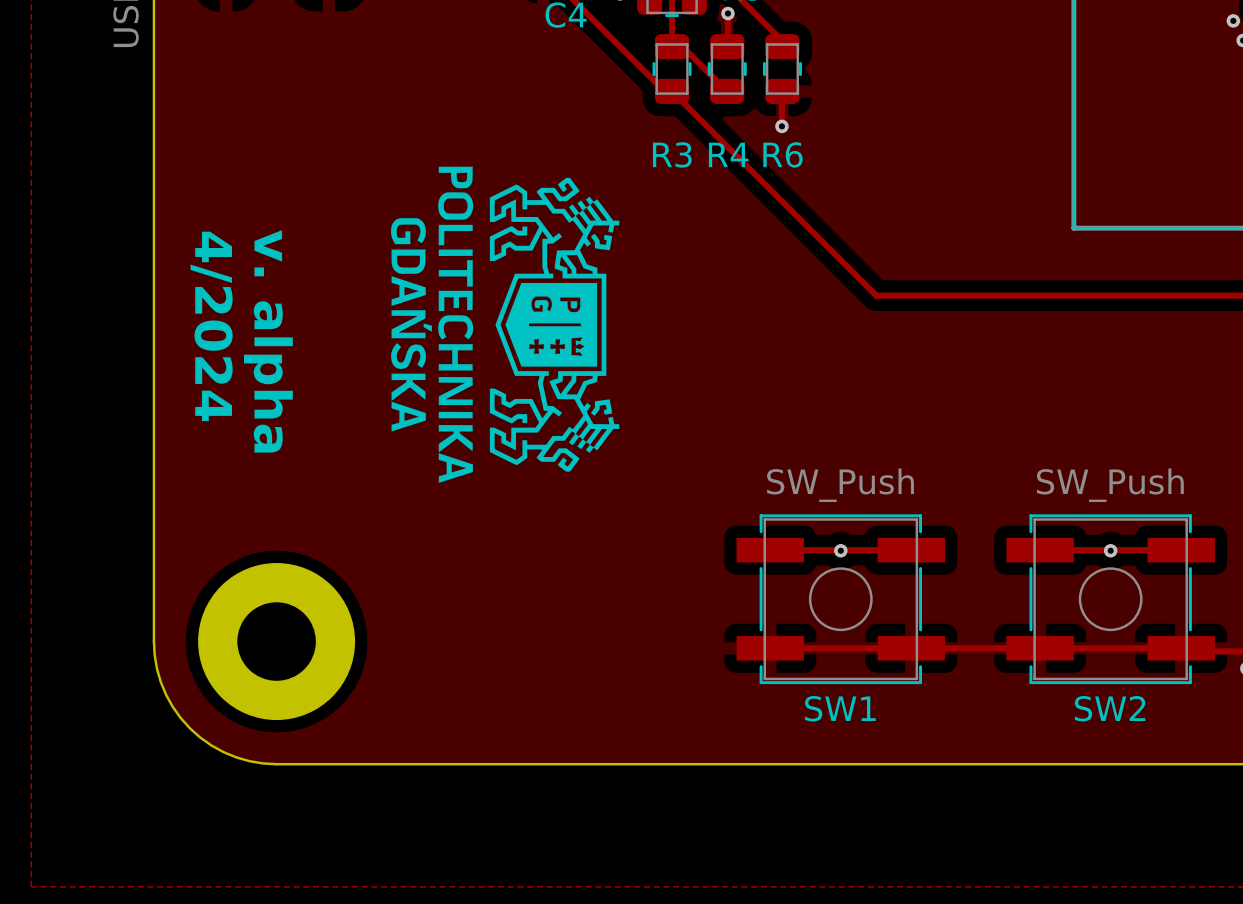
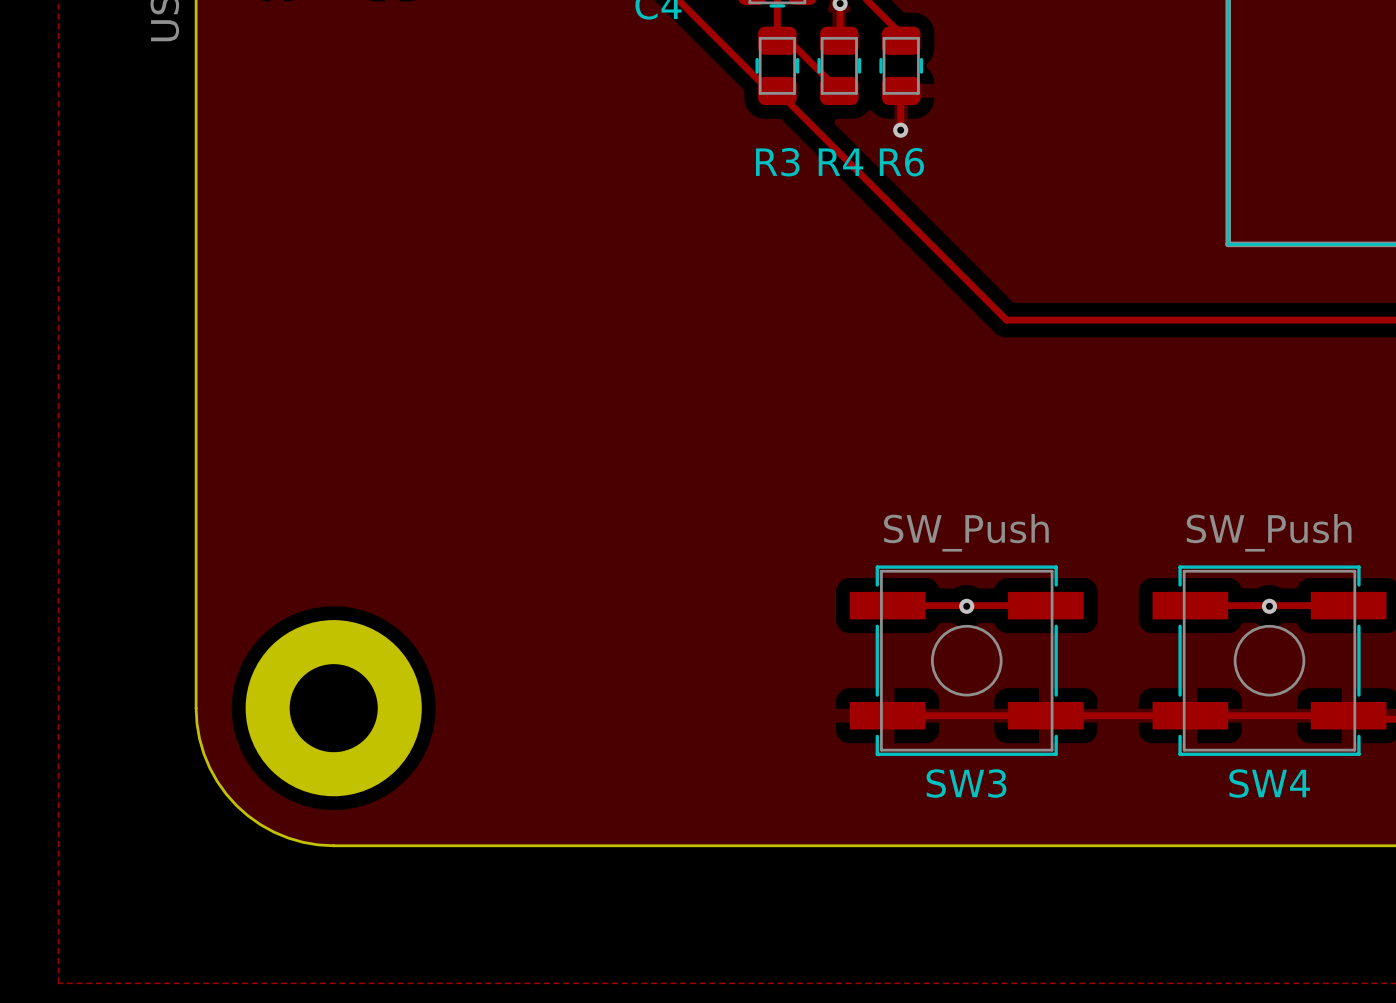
drawing: [391, 166, 620, 483] -> none
text: 4/2024 (211, 326) -> none
text: v. alpha (268, 341) -> none
SW1 name: SW1 (840, 708) -> SW3 (966, 783)
SW2 name: SW2 (1110, 708) -> SW4 (1269, 783)

